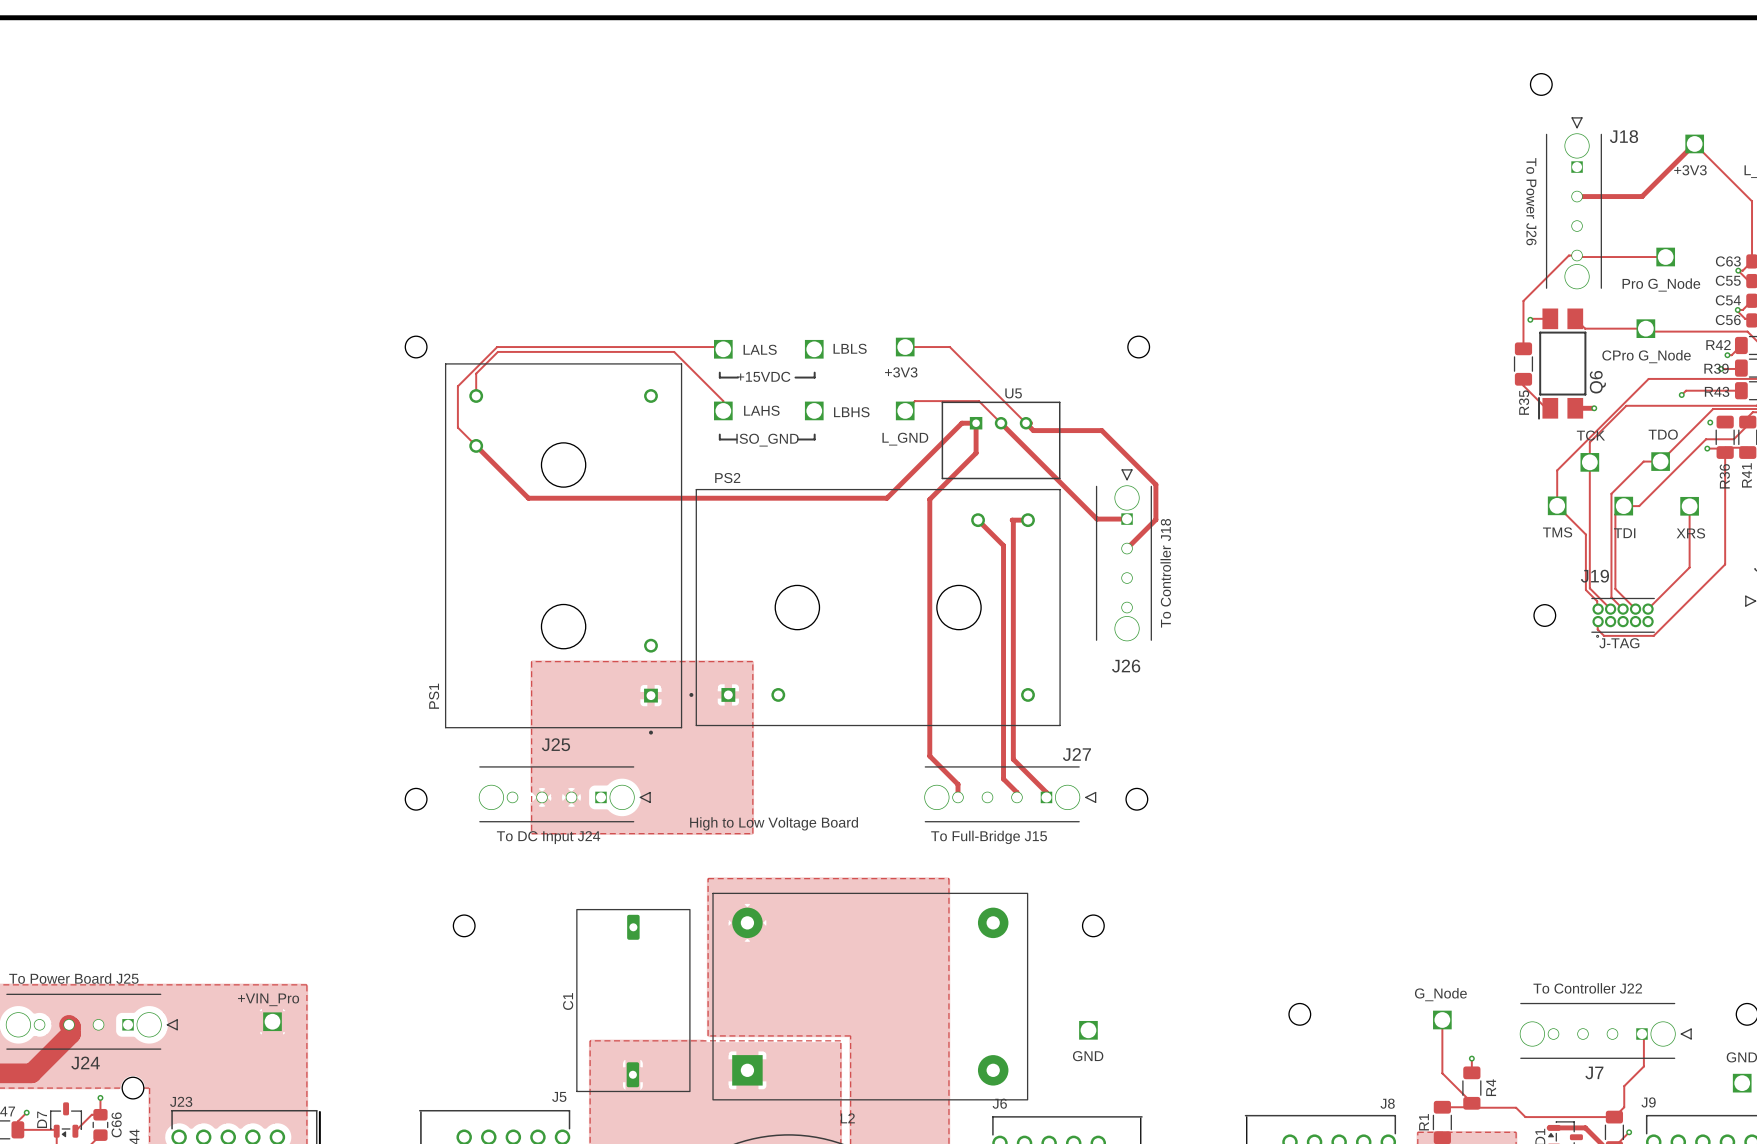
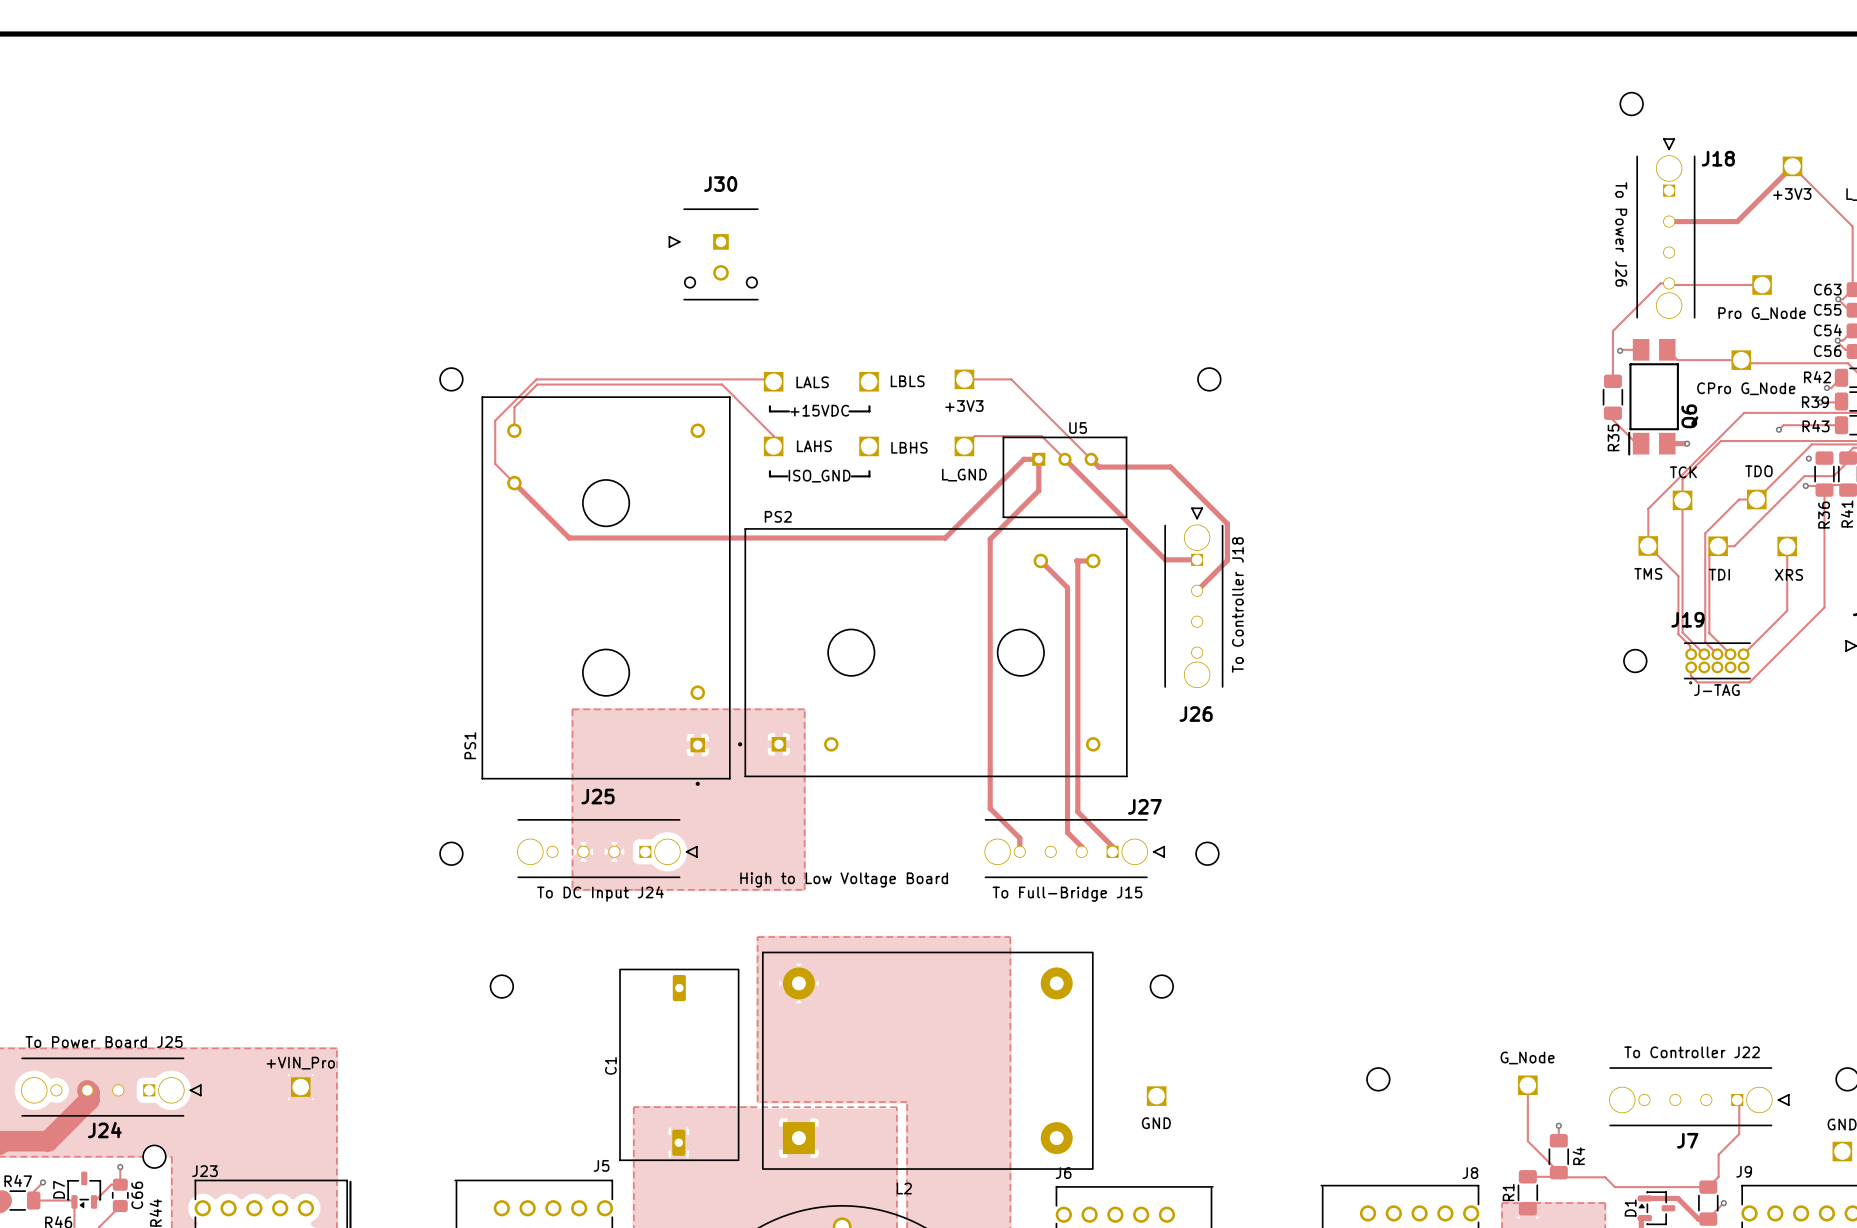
J30: none -> (713, 254)

